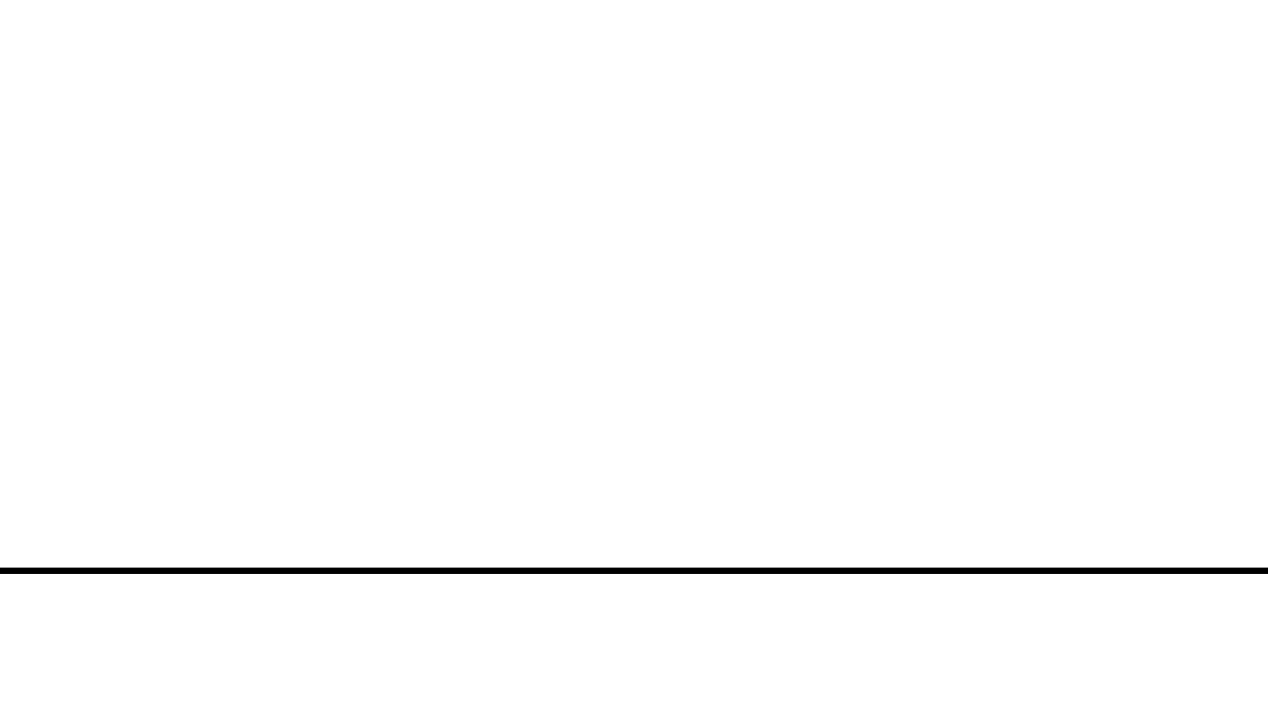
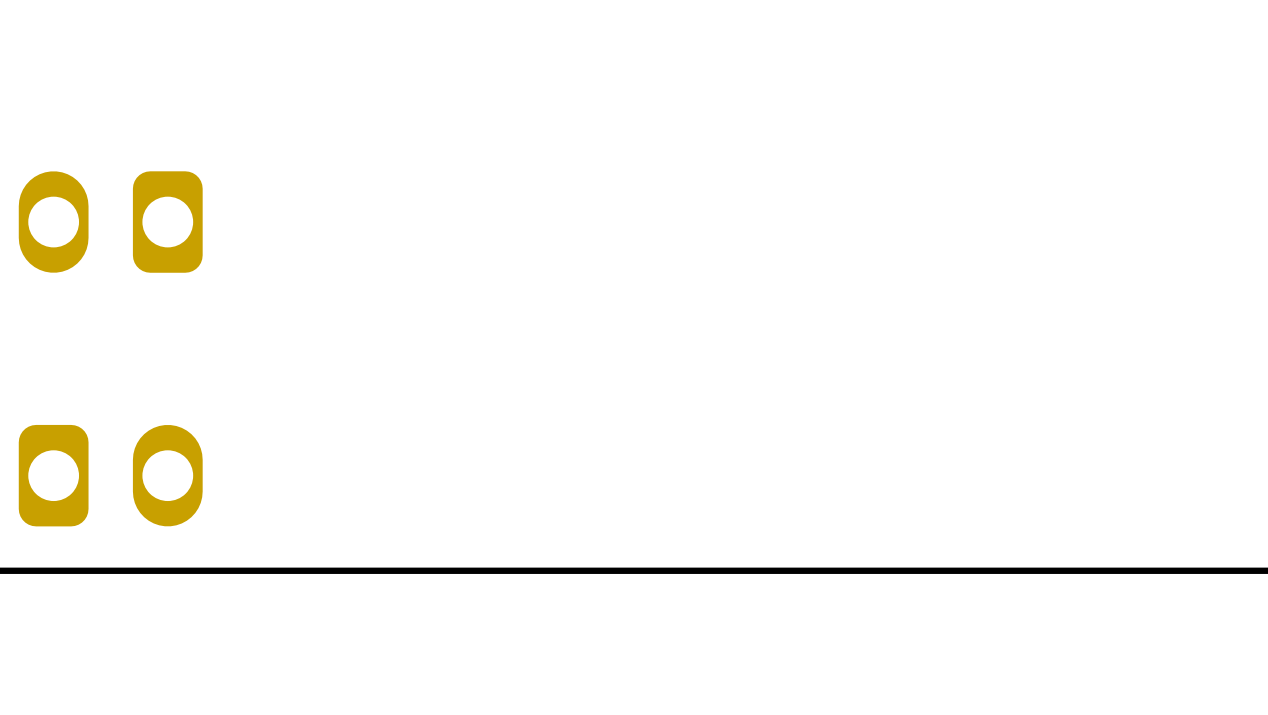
part: none -> (110, 348)

